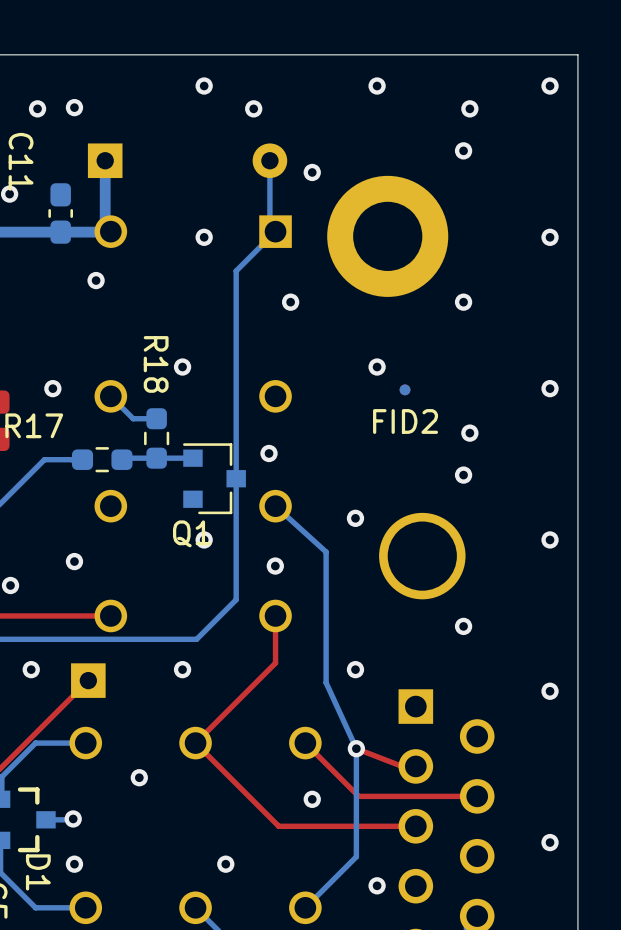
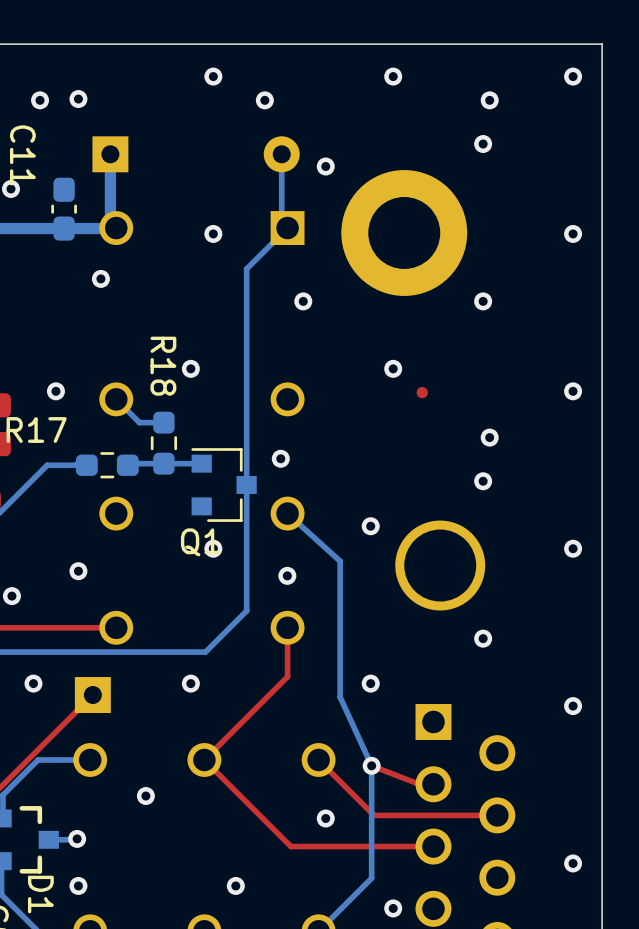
FID2: (405, 389) -> none

